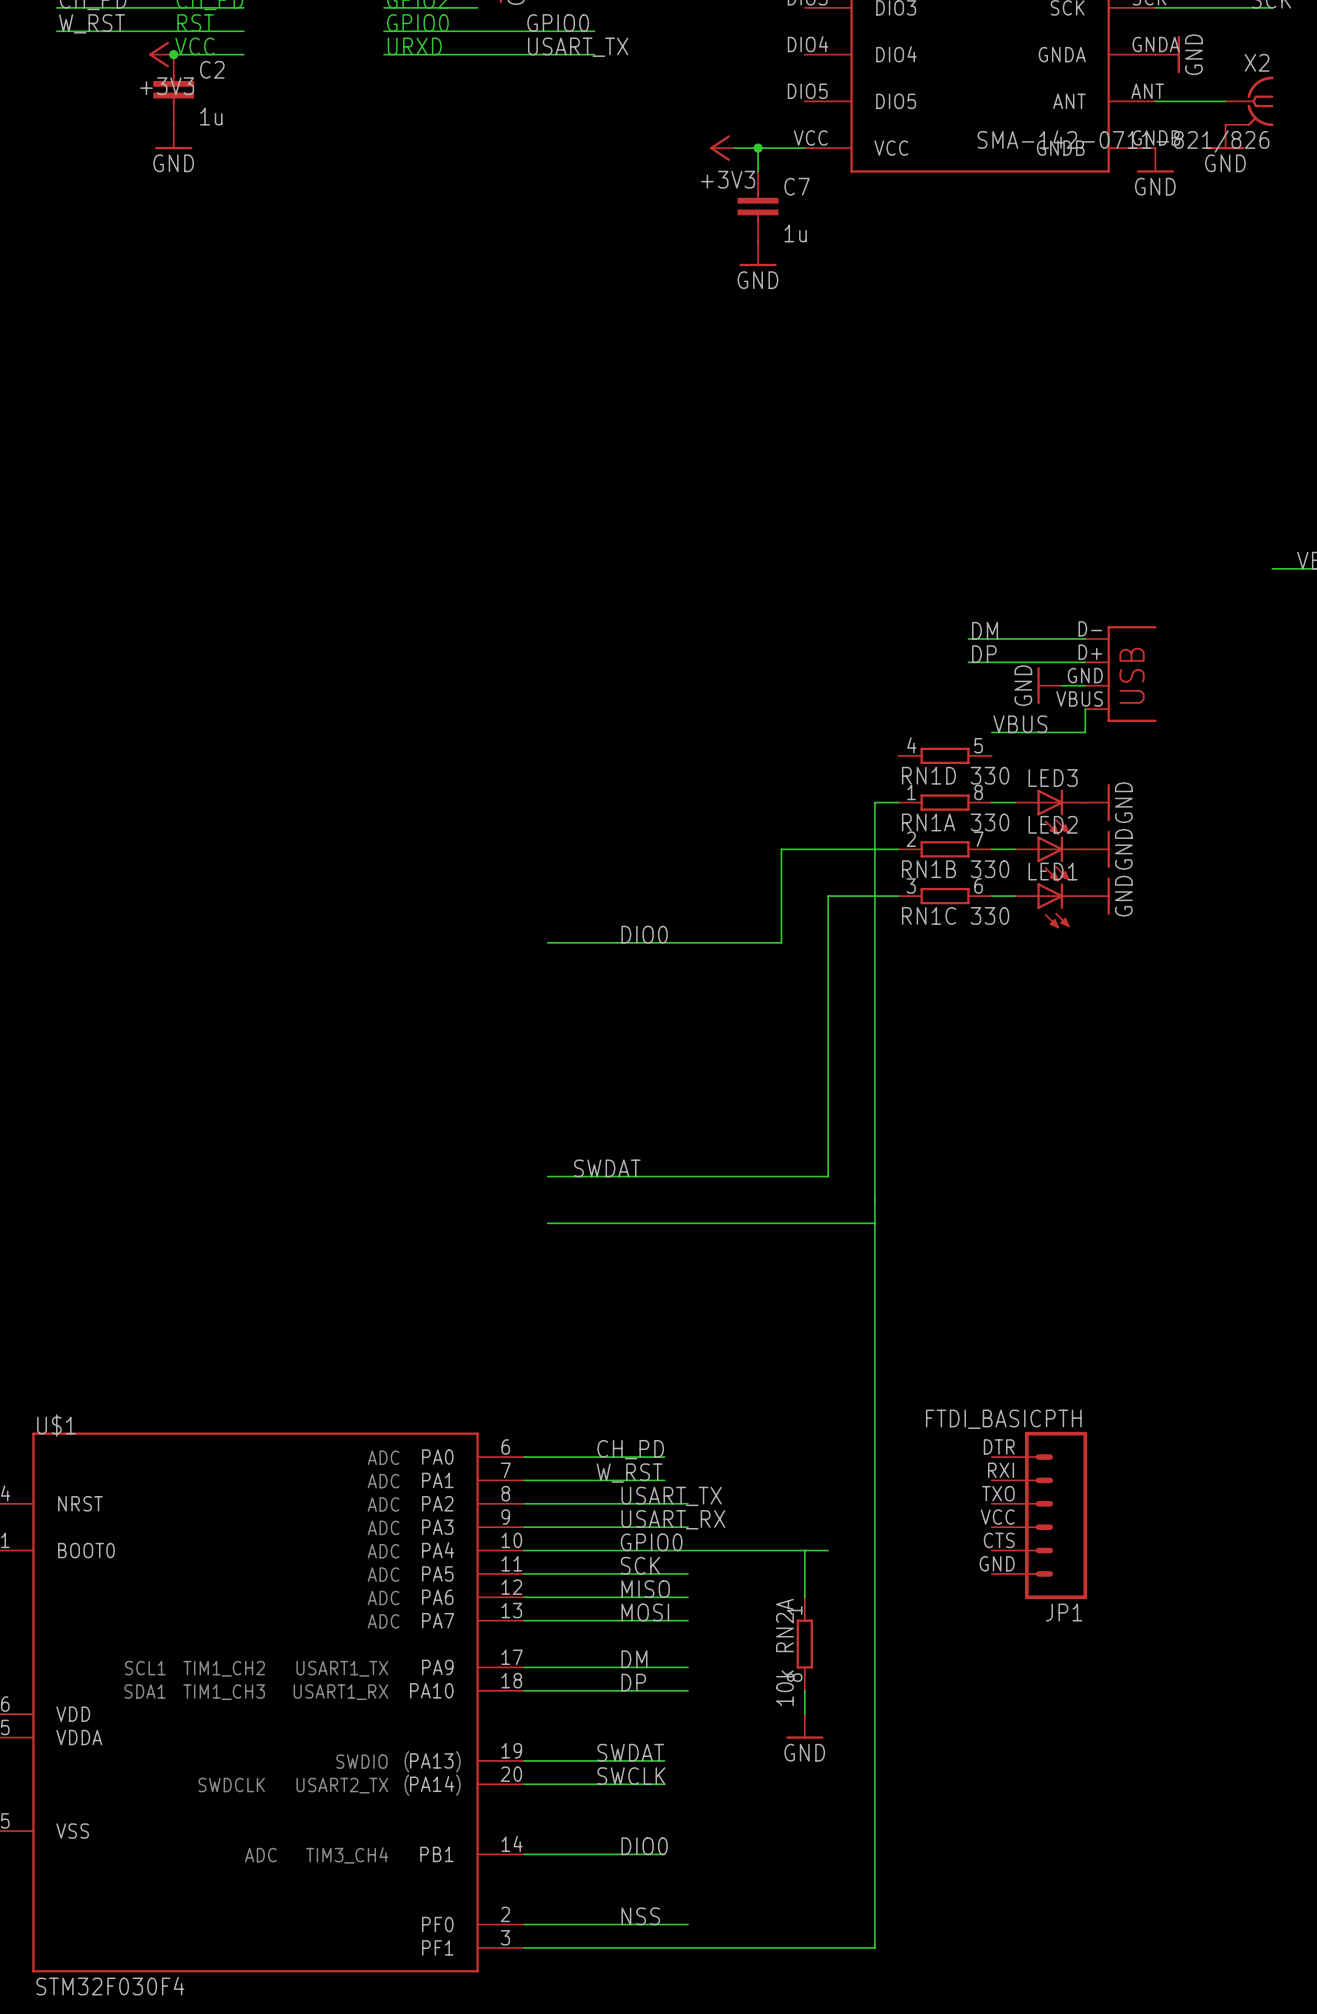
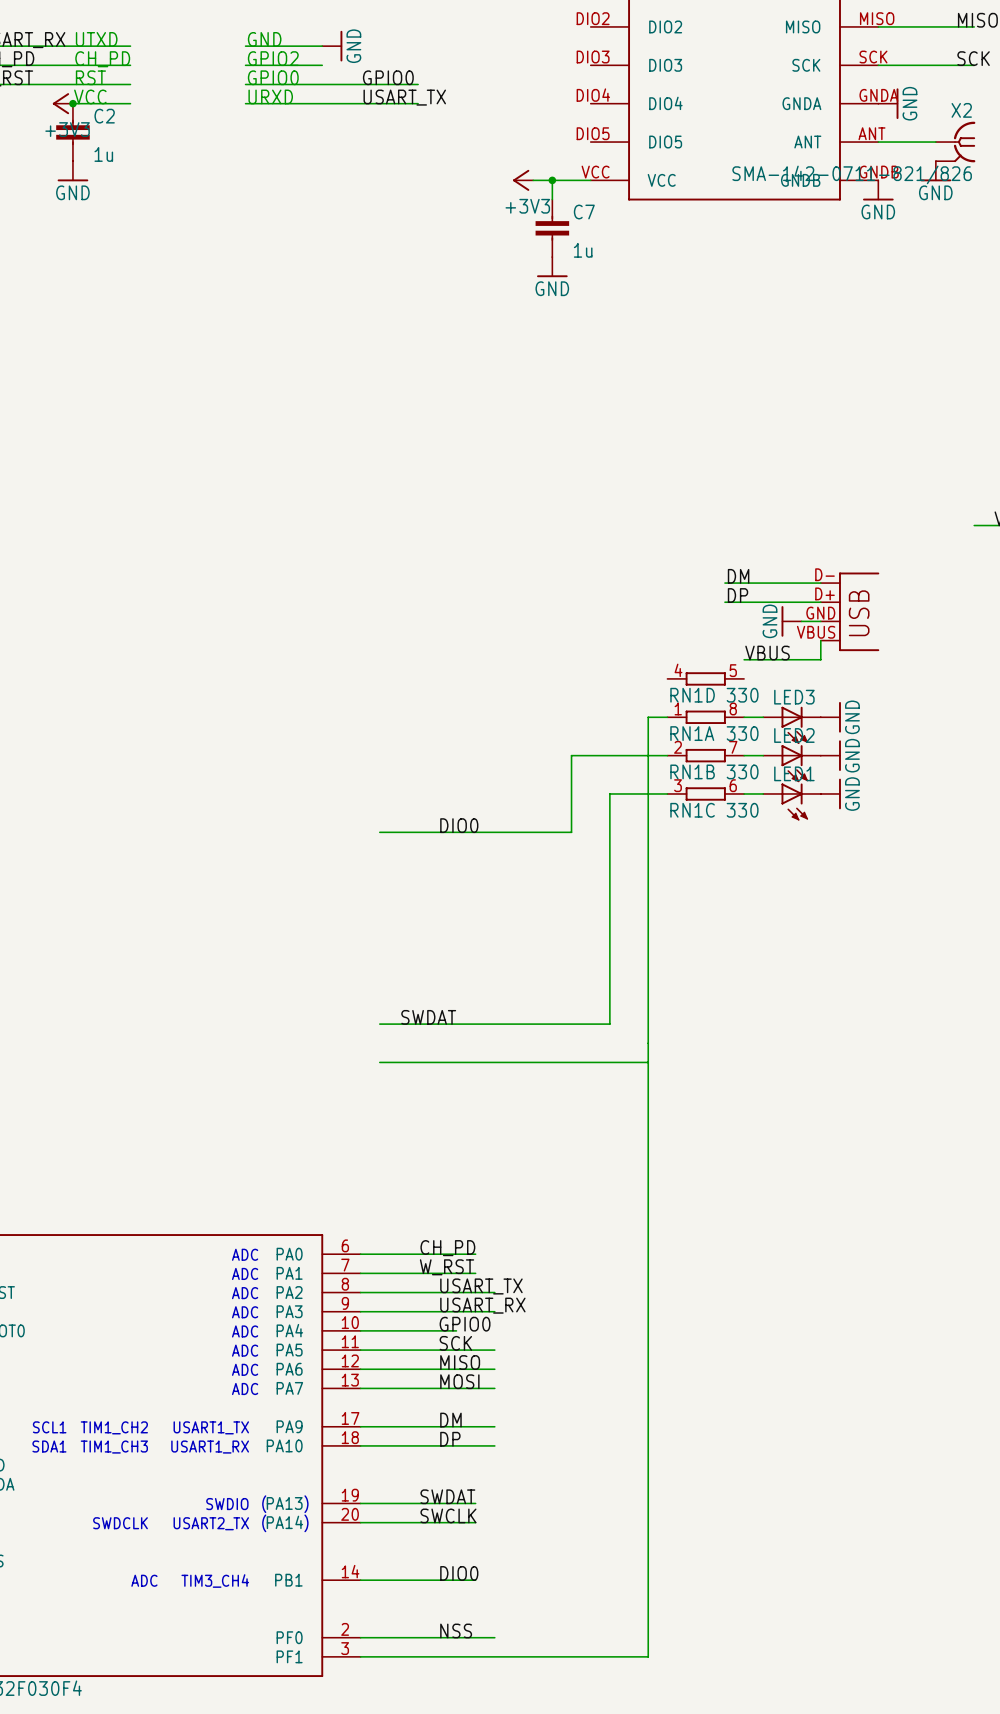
JP1: FTDI_BASICPTH (1039, 1515) -> none
wire: (641, 1550) (828, 1550) -> none
wire: (804, 1550) (804, 1597) -> none
RN2A: 10k (804, 1644) -> none
wire: (804, 1690) (804, 1714) -> none
power symbol: GND (804, 1726) -> none

